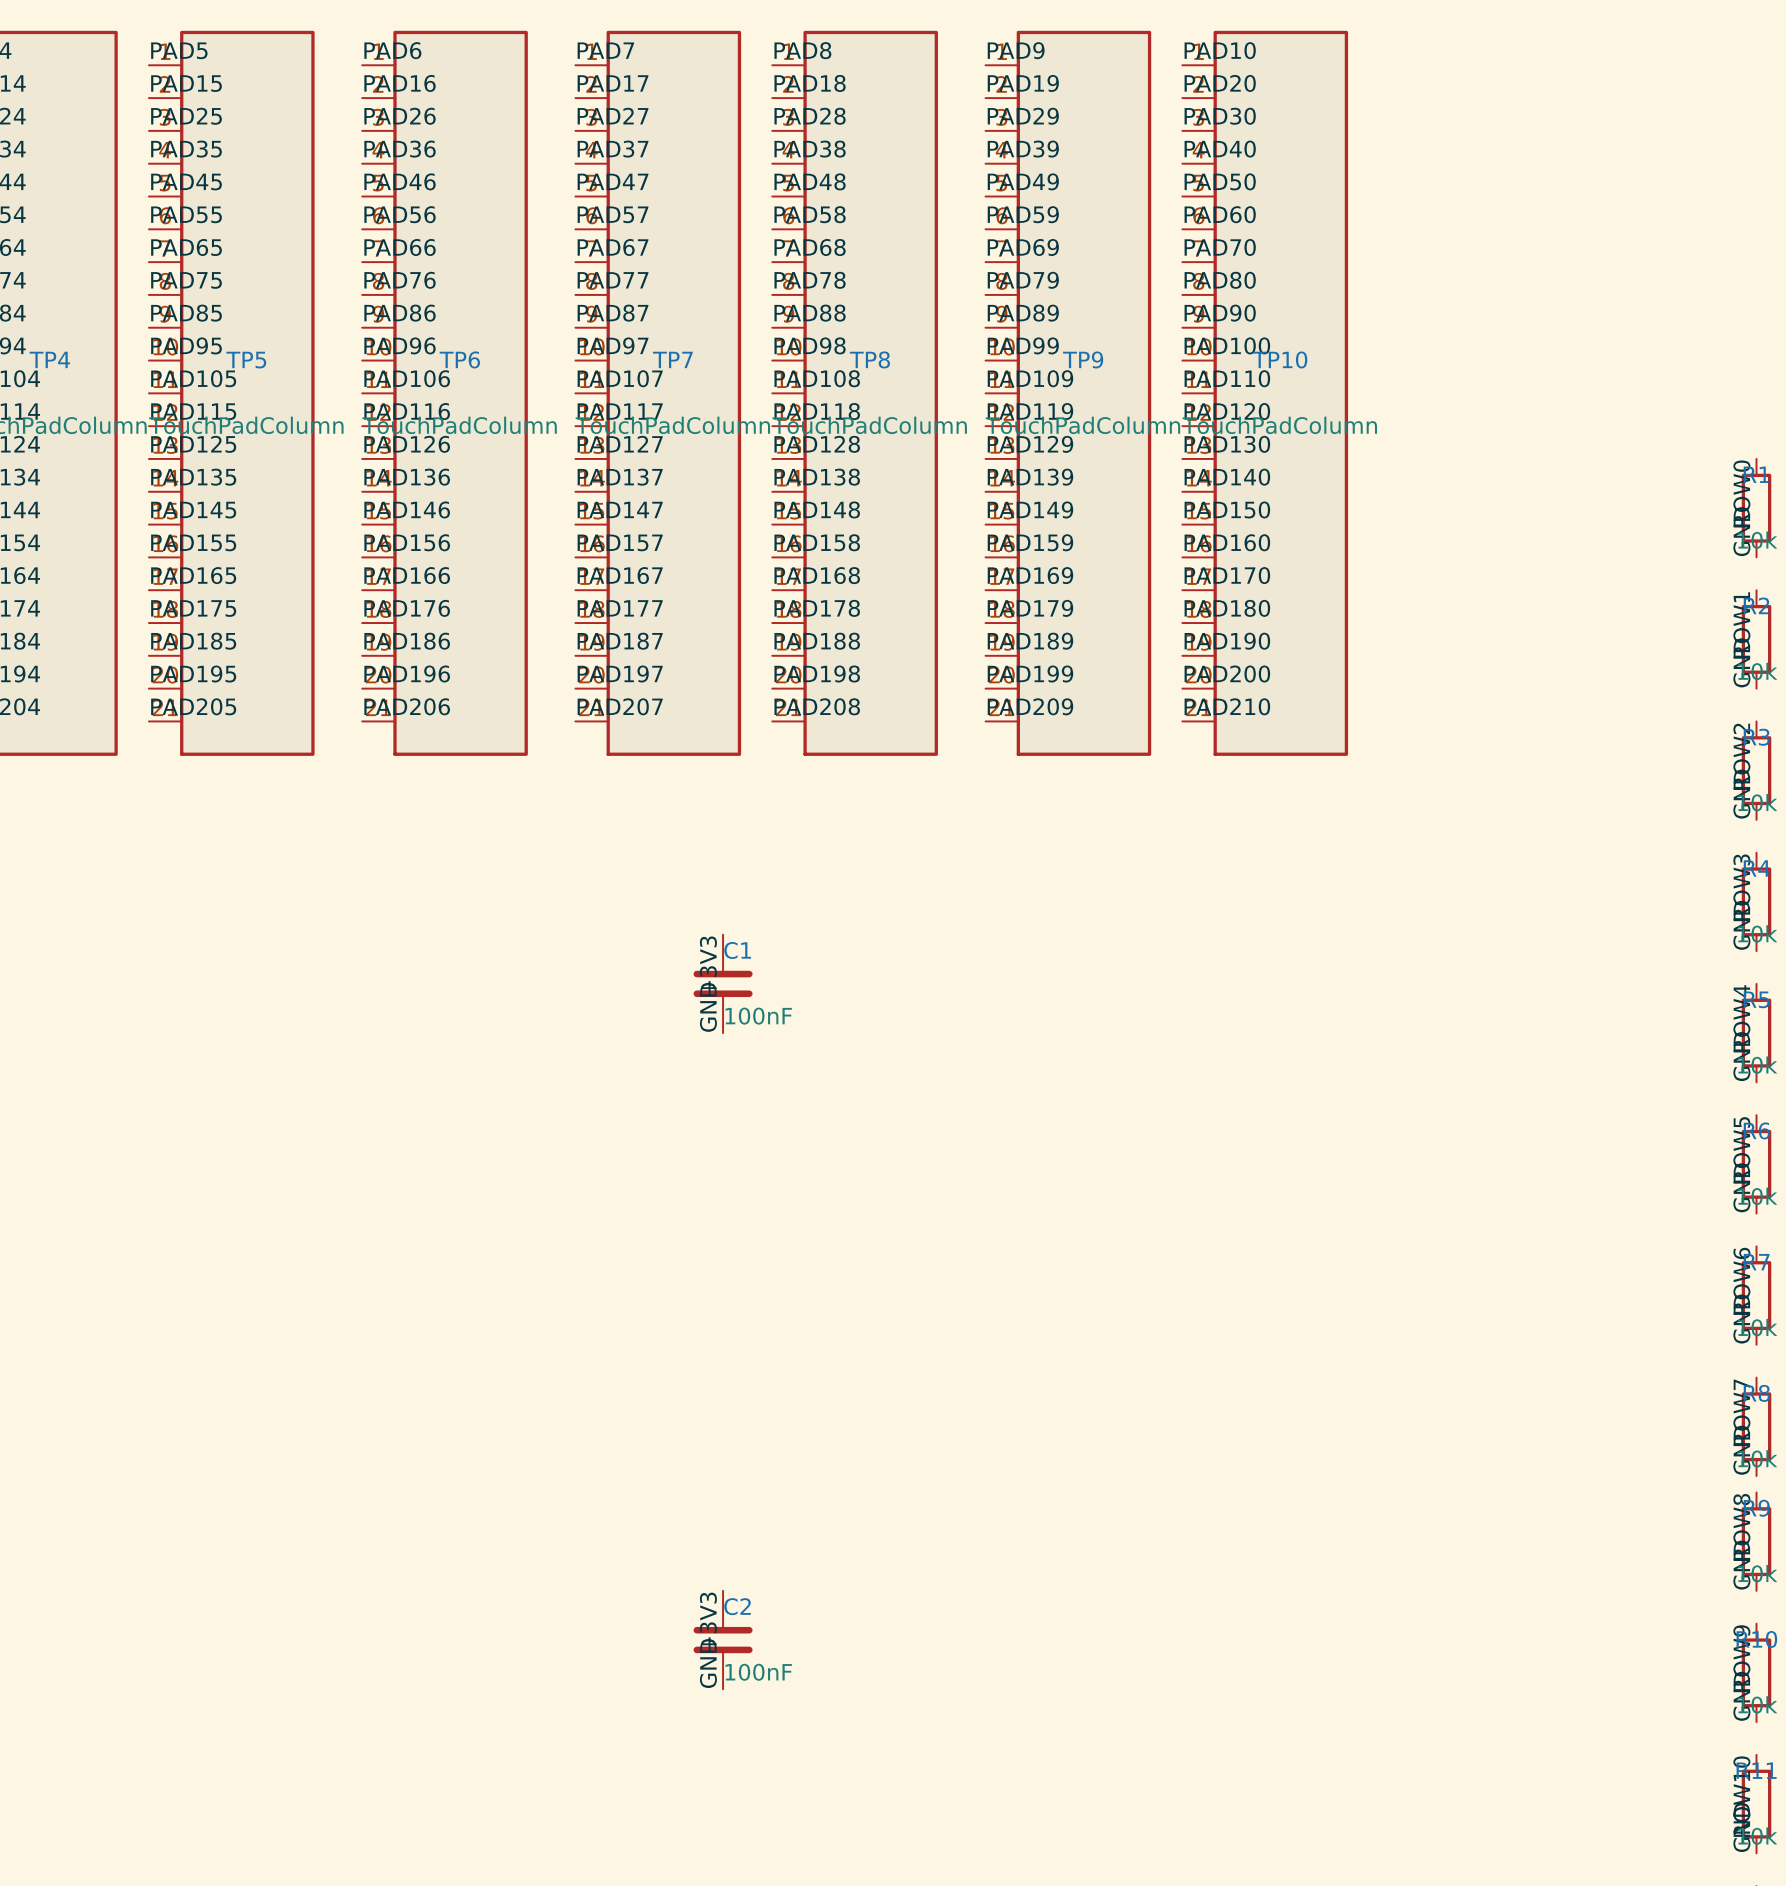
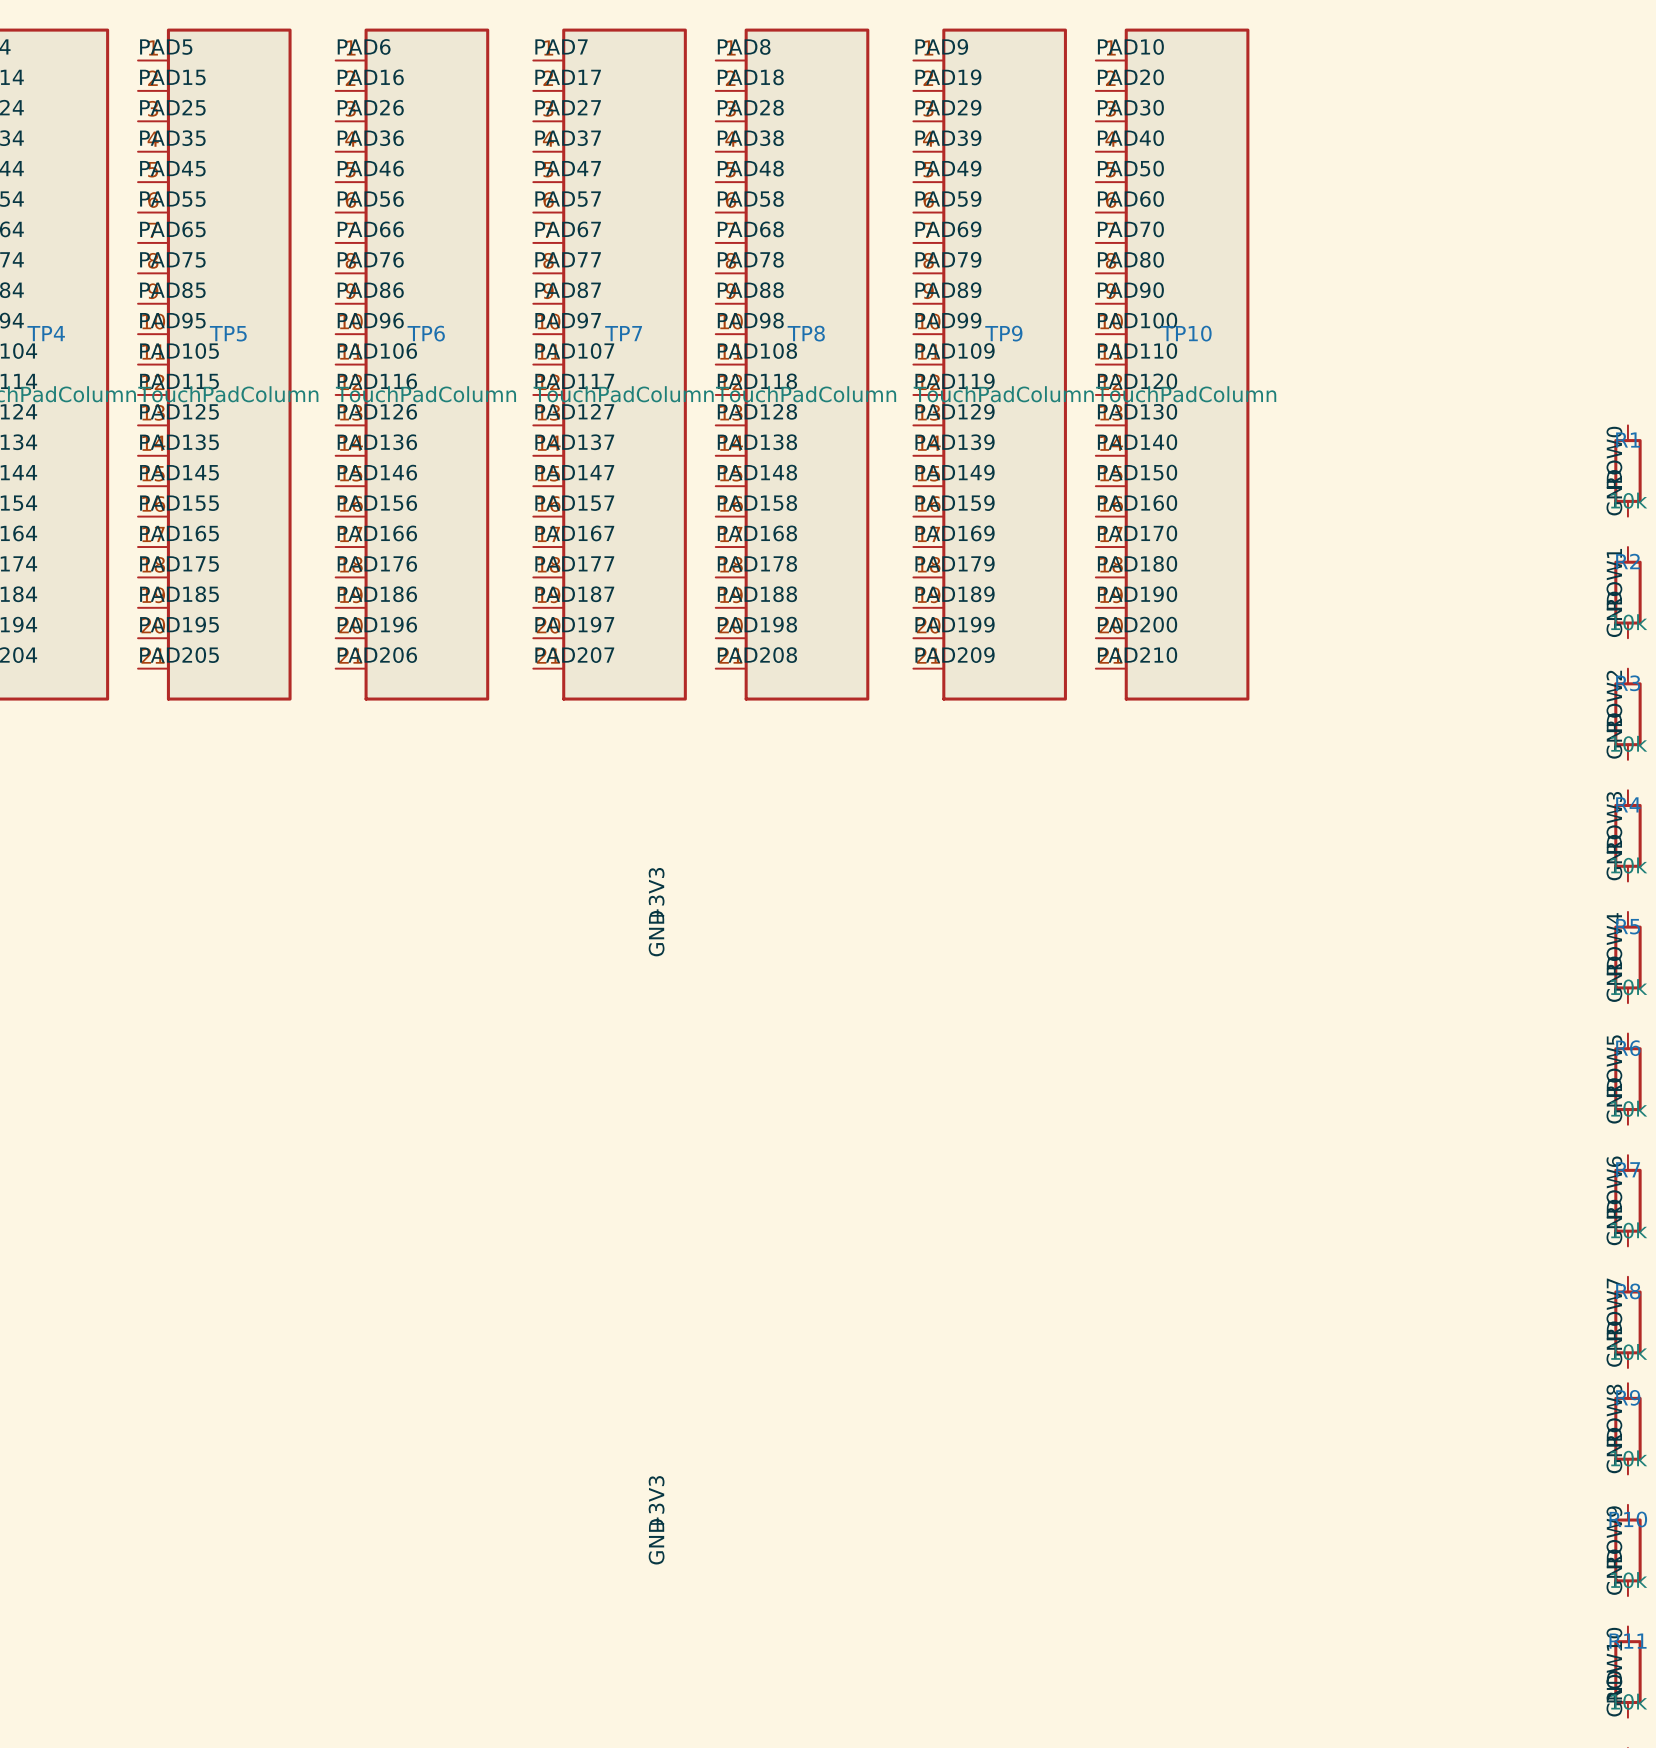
C1: 100nF (723, 983) -> none
C2: 100nF (723, 1640) -> none

